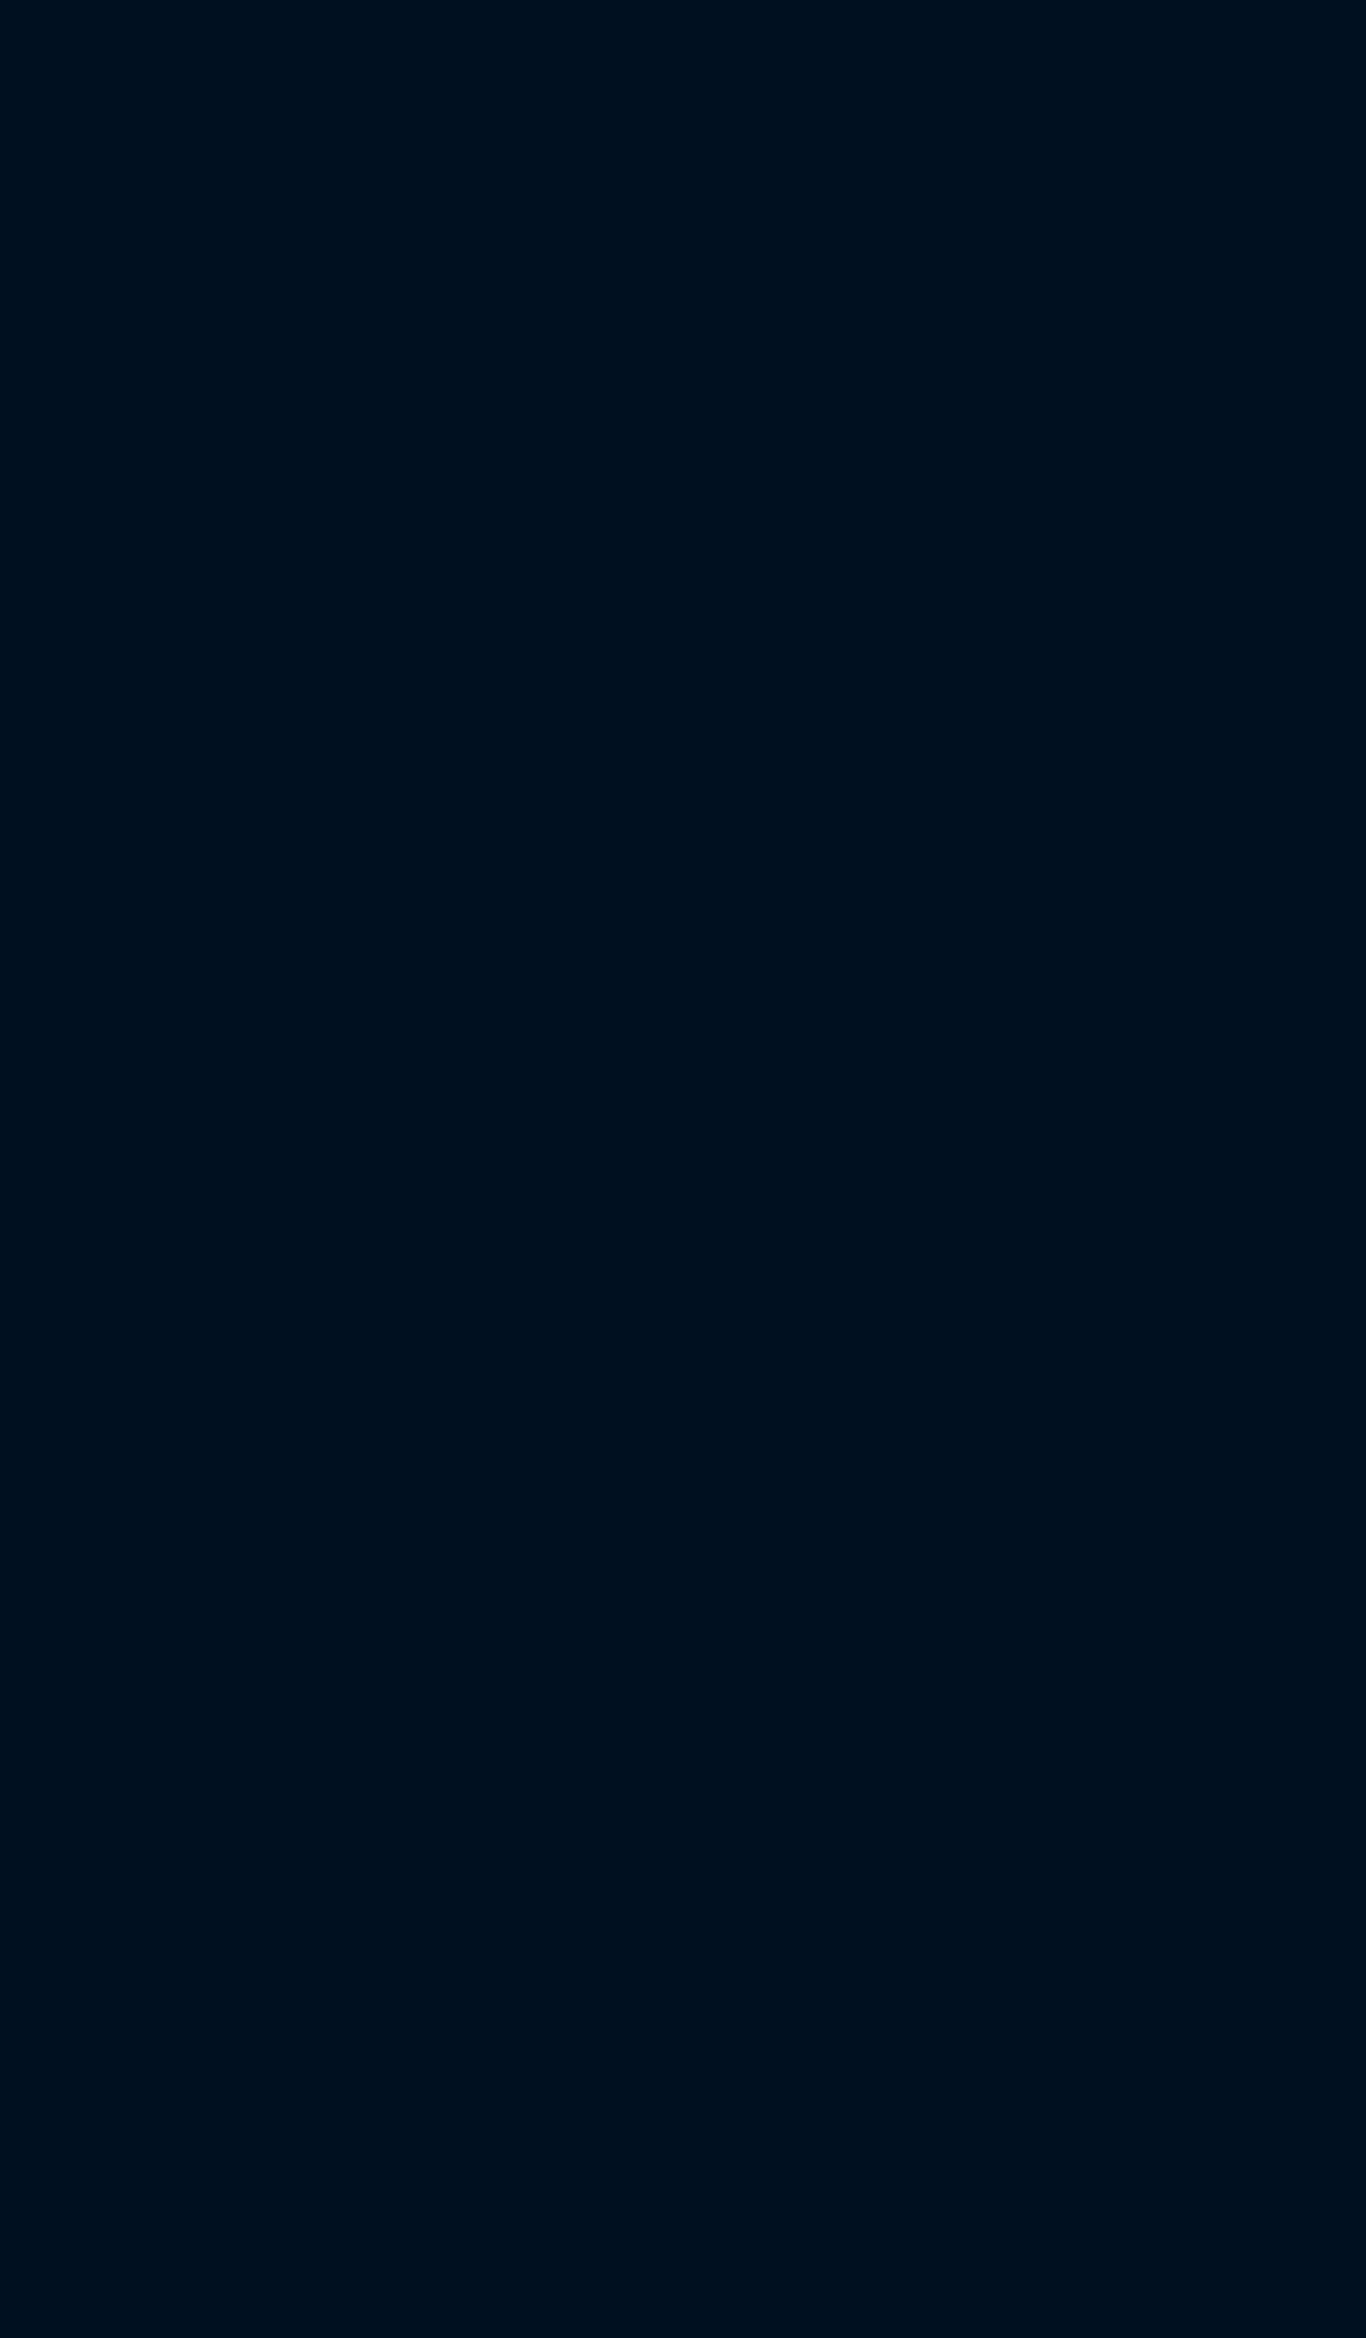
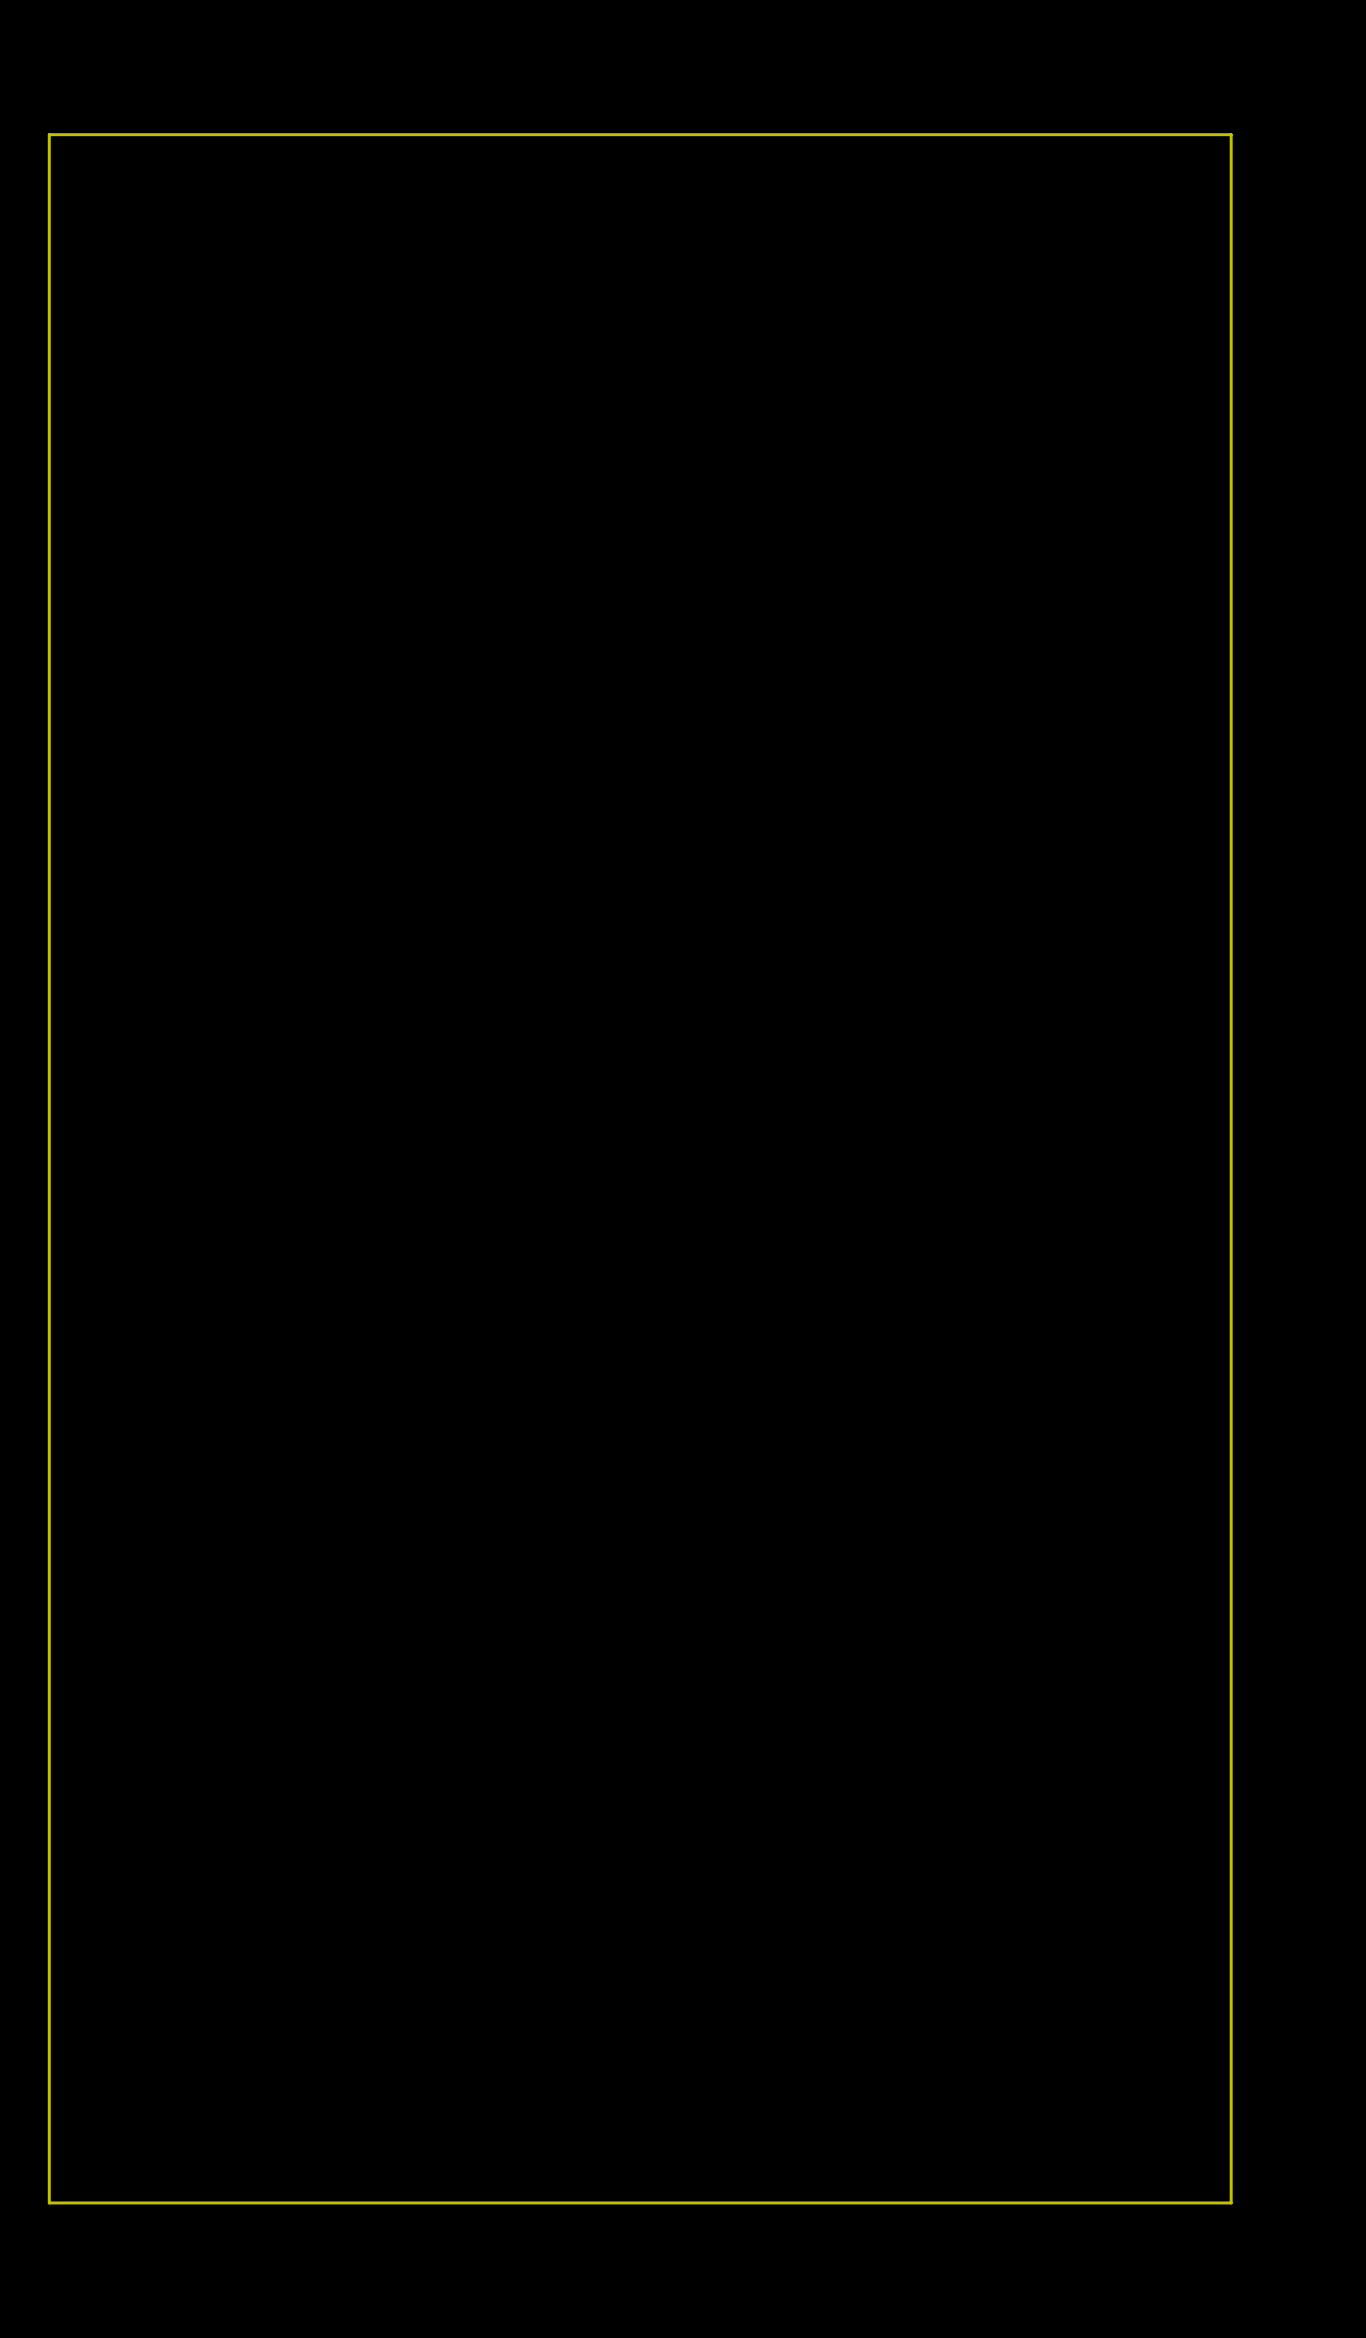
board edge: none -> (49, 134) (49, 2202) (1231, 2202) (1231, 134) (49, 134)

